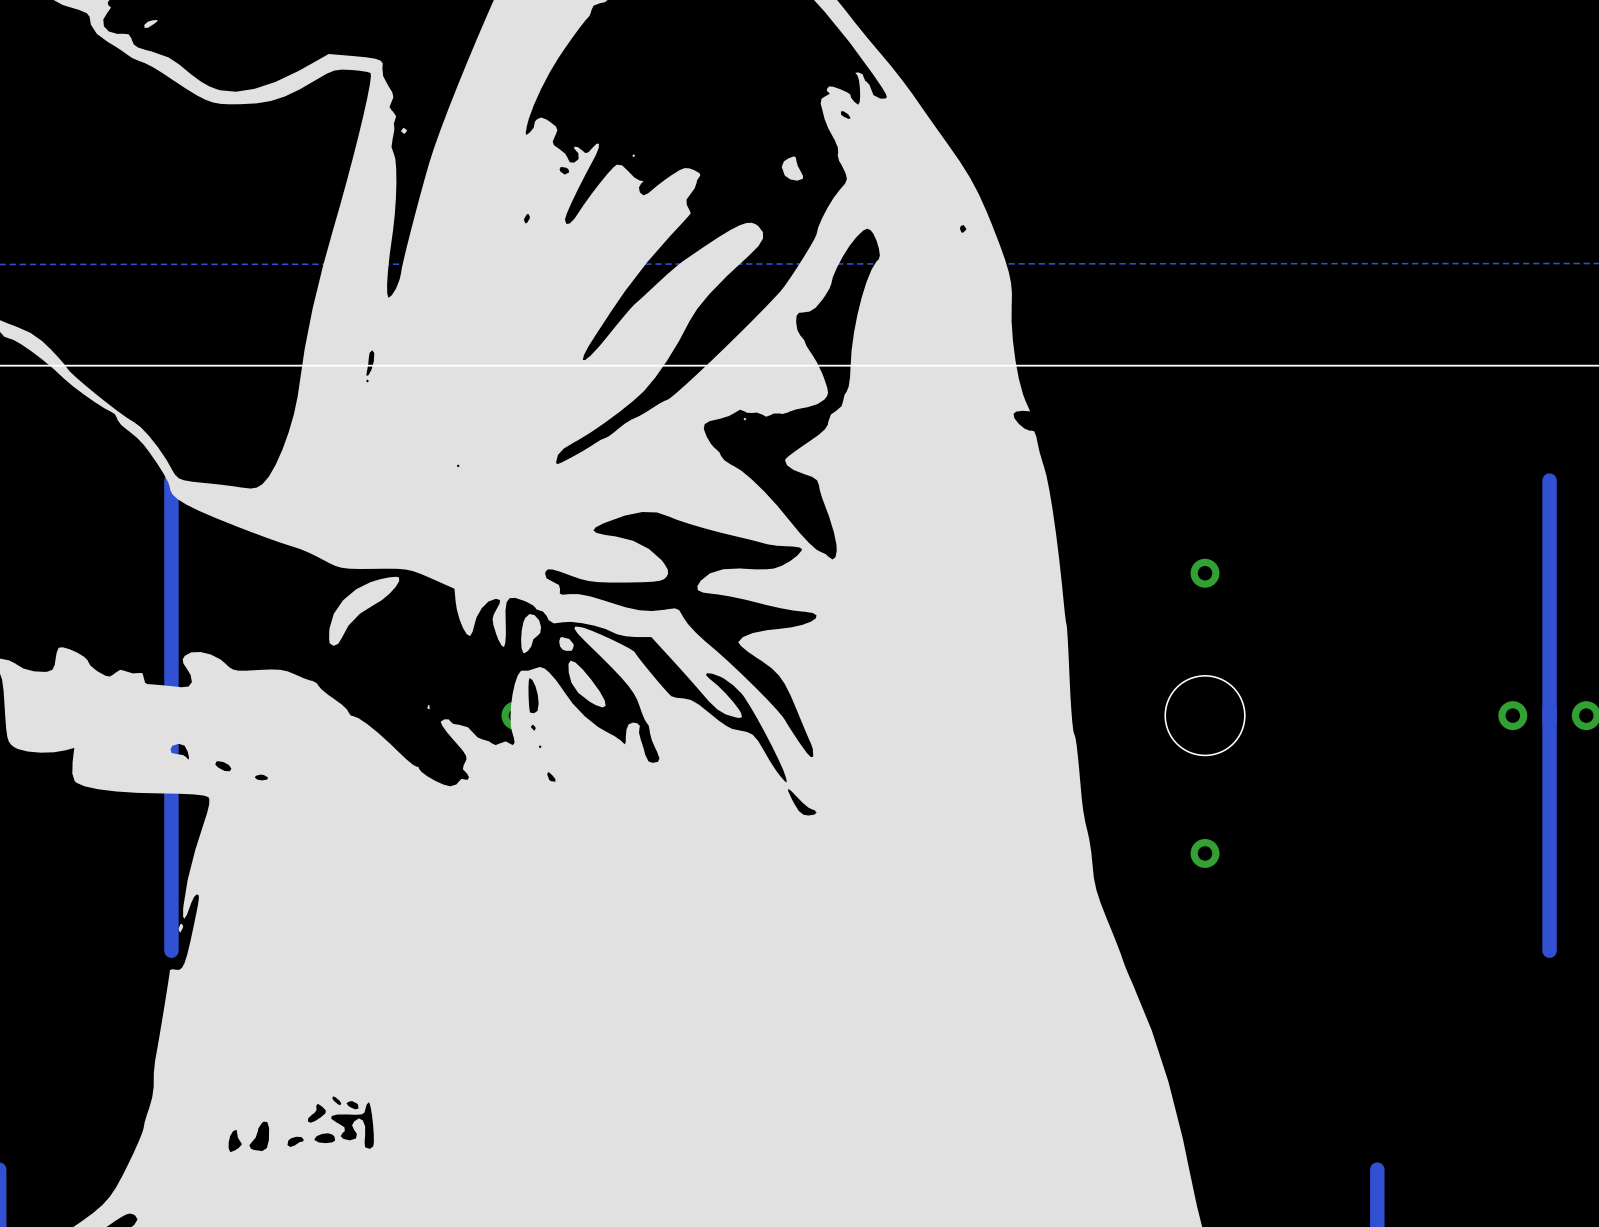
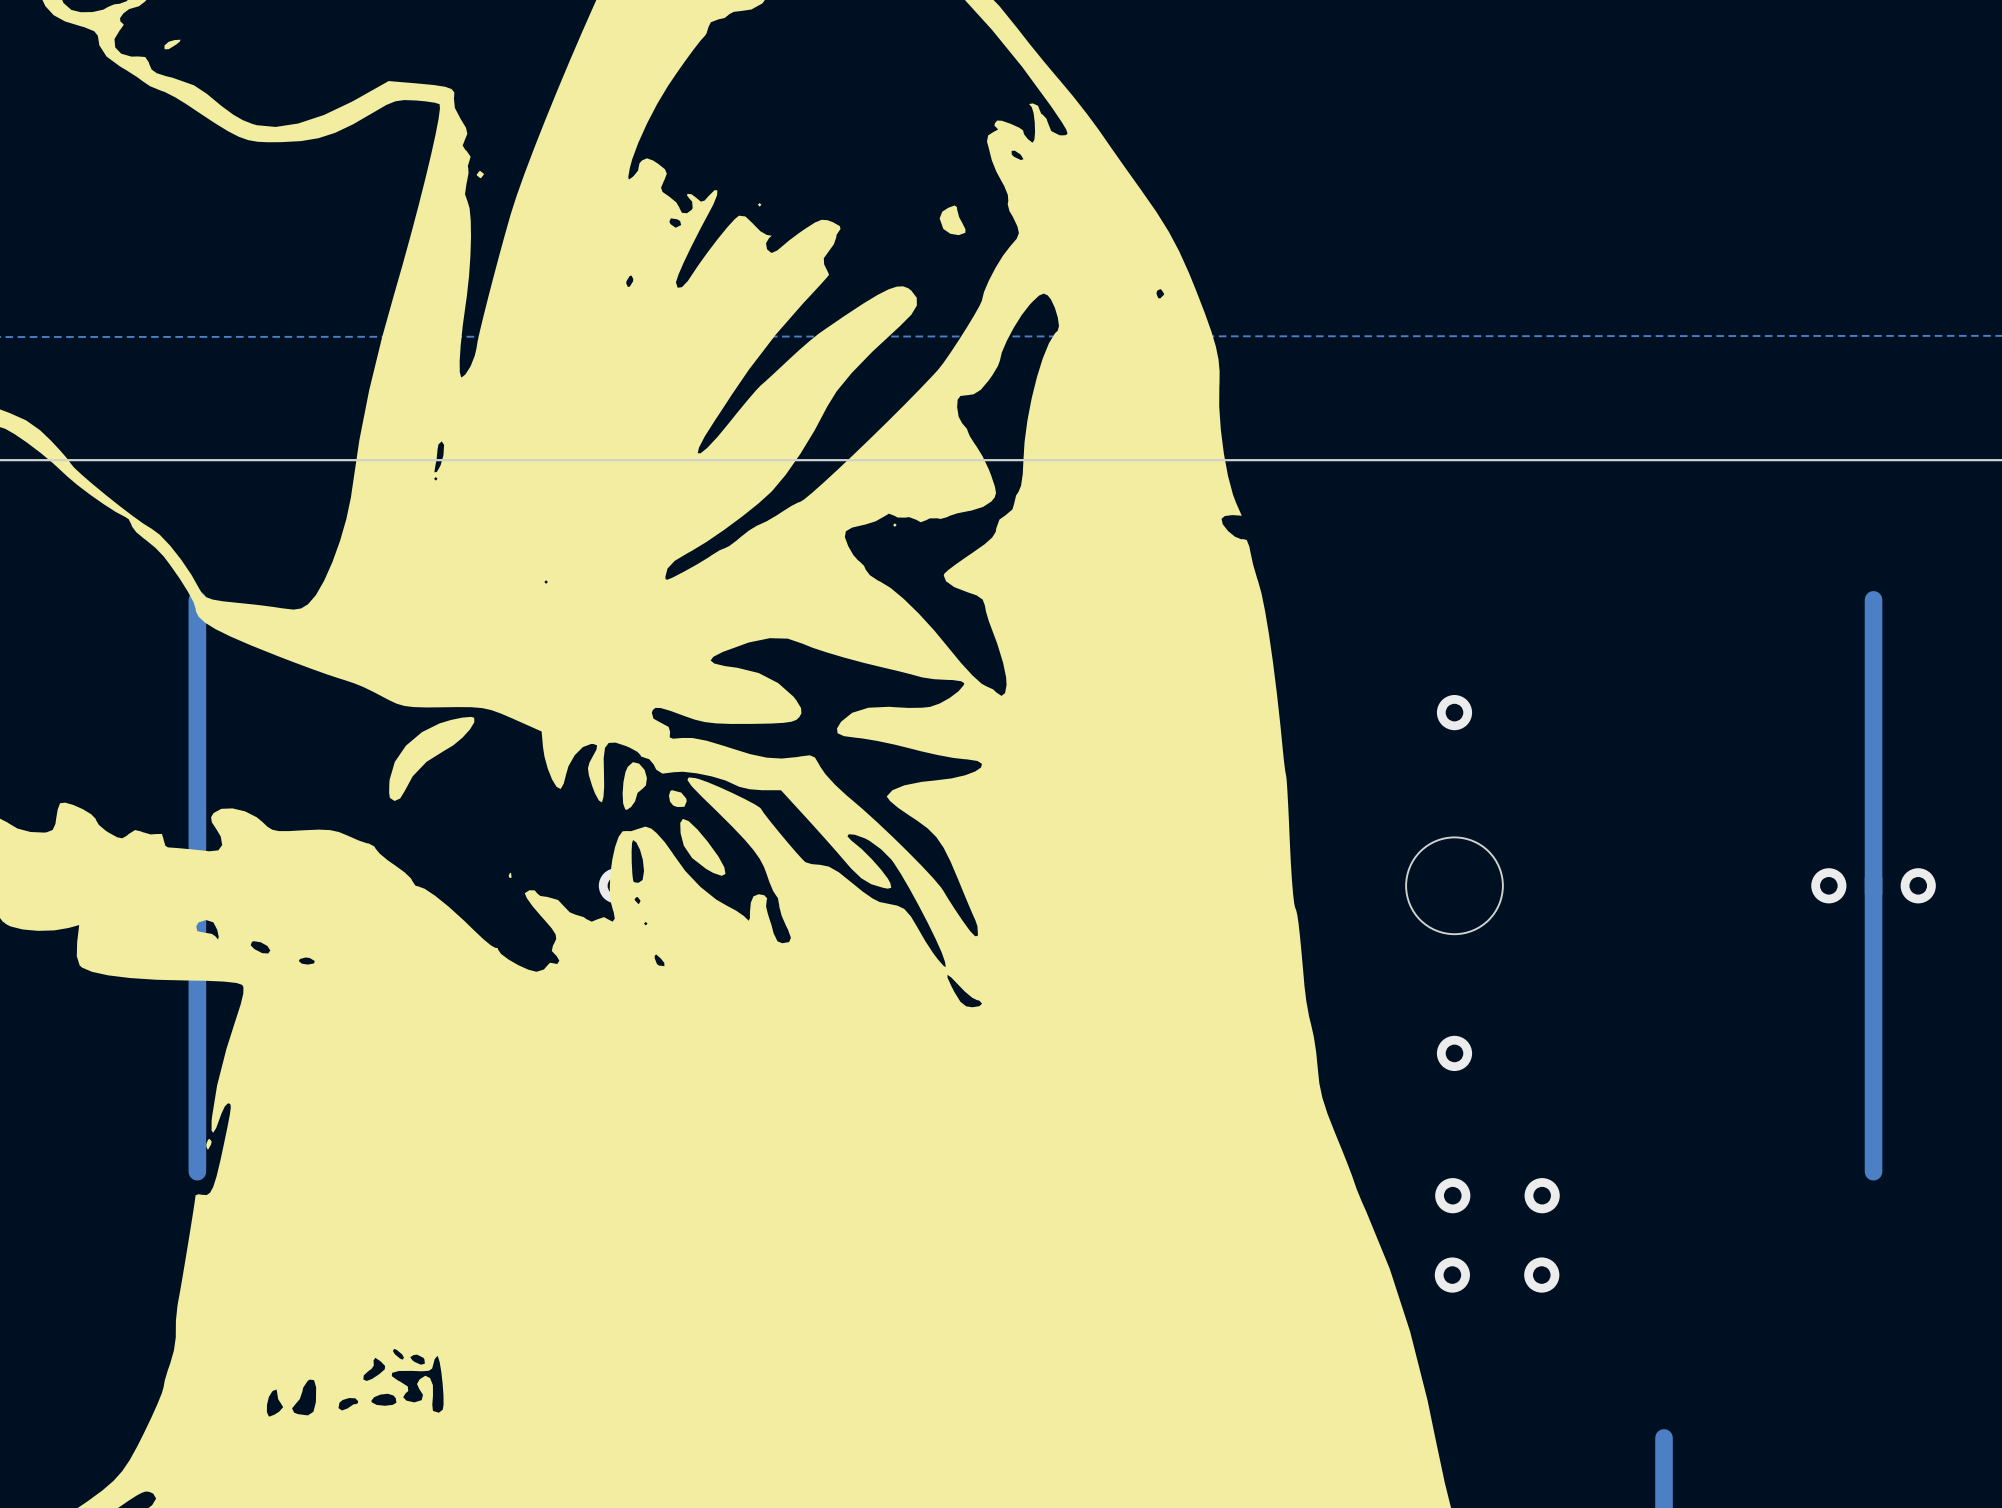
via: none -> (1452, 1195)
via: none -> (1542, 1195)
via: none -> (1452, 1275)
via: none -> (1541, 1275)

